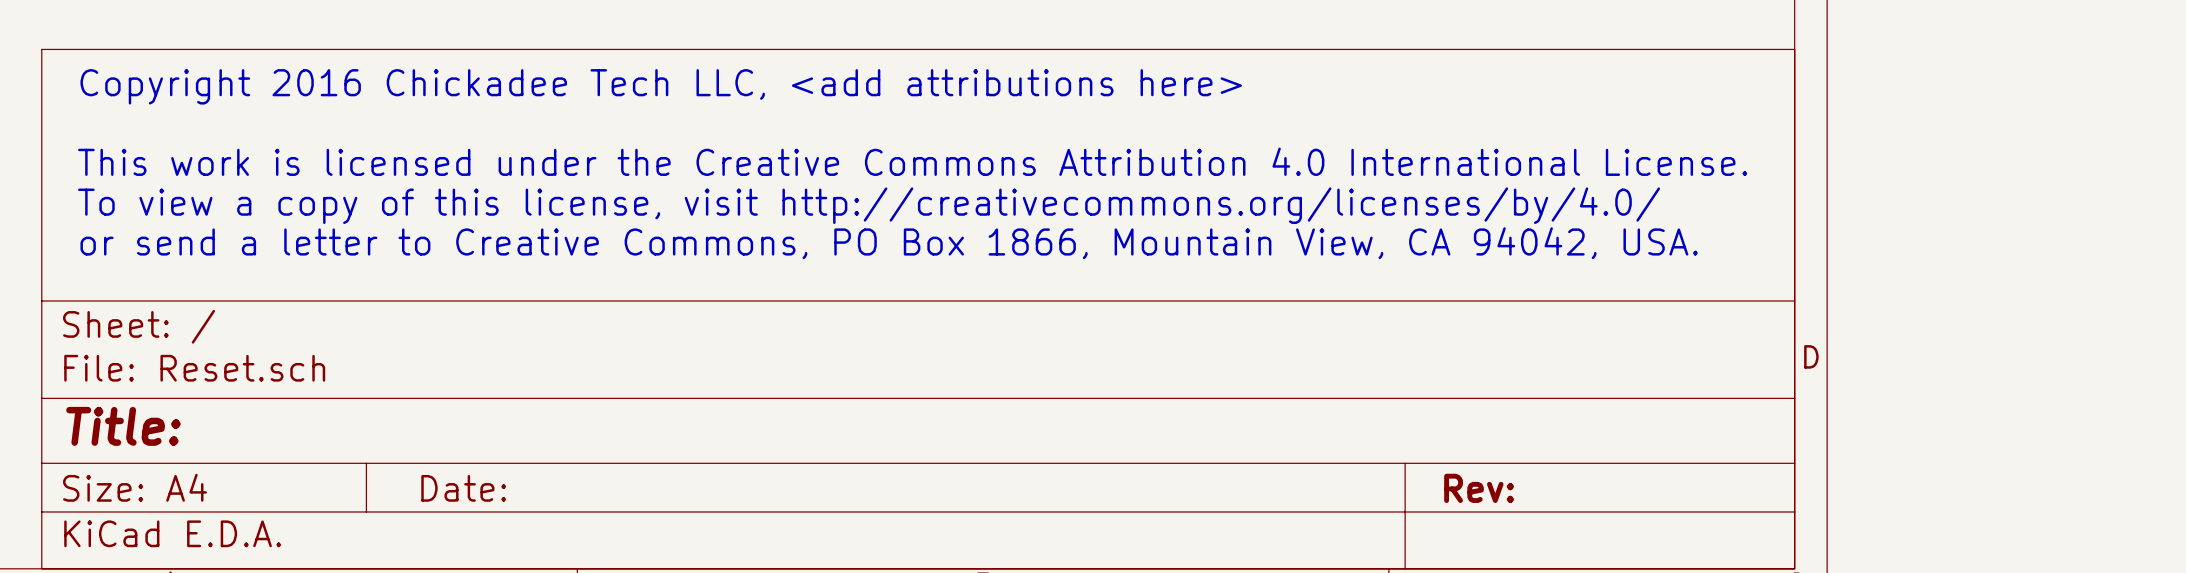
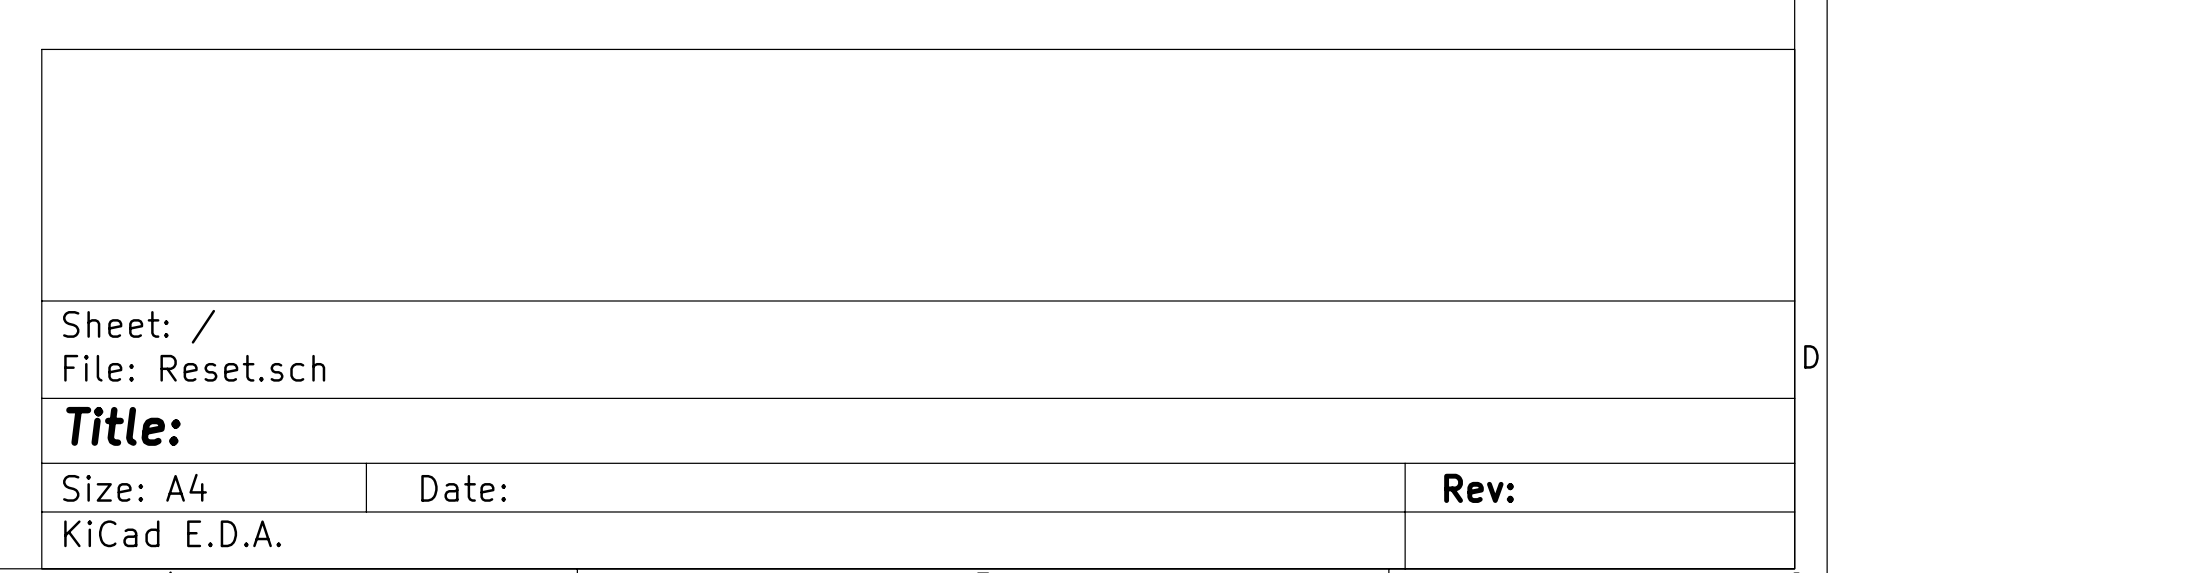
text: Copyright 2016 Chickadee Tech LLC, <add attributions here> (661, 86) -> none
text: This work is licensed under the Creative Commons Attribution 4.0 International License. (912, 161) -> none
text: To view a copy of this license, visit http://creativecommons.org/licenses/by/4.0/ (869, 205) -> none
text: or send a letter to Creative Commons, PO Box 1866, Mountain View, CA 94042, USA. (889, 243) -> none

